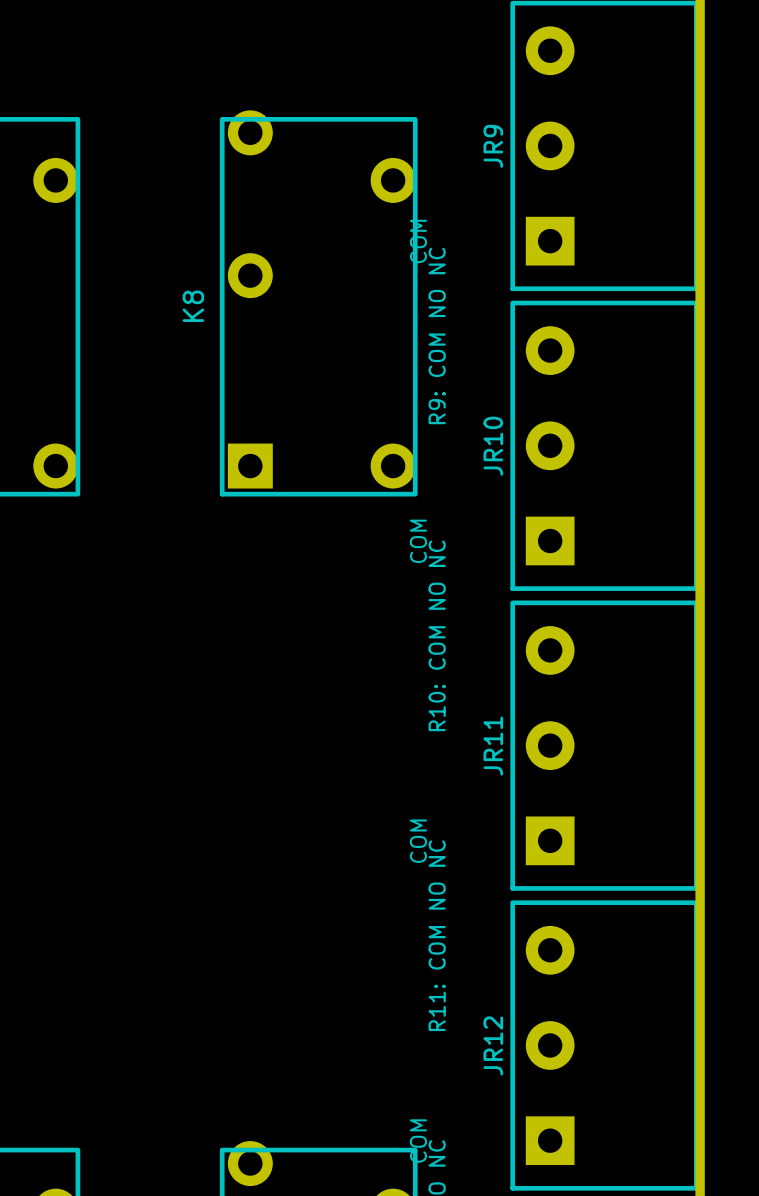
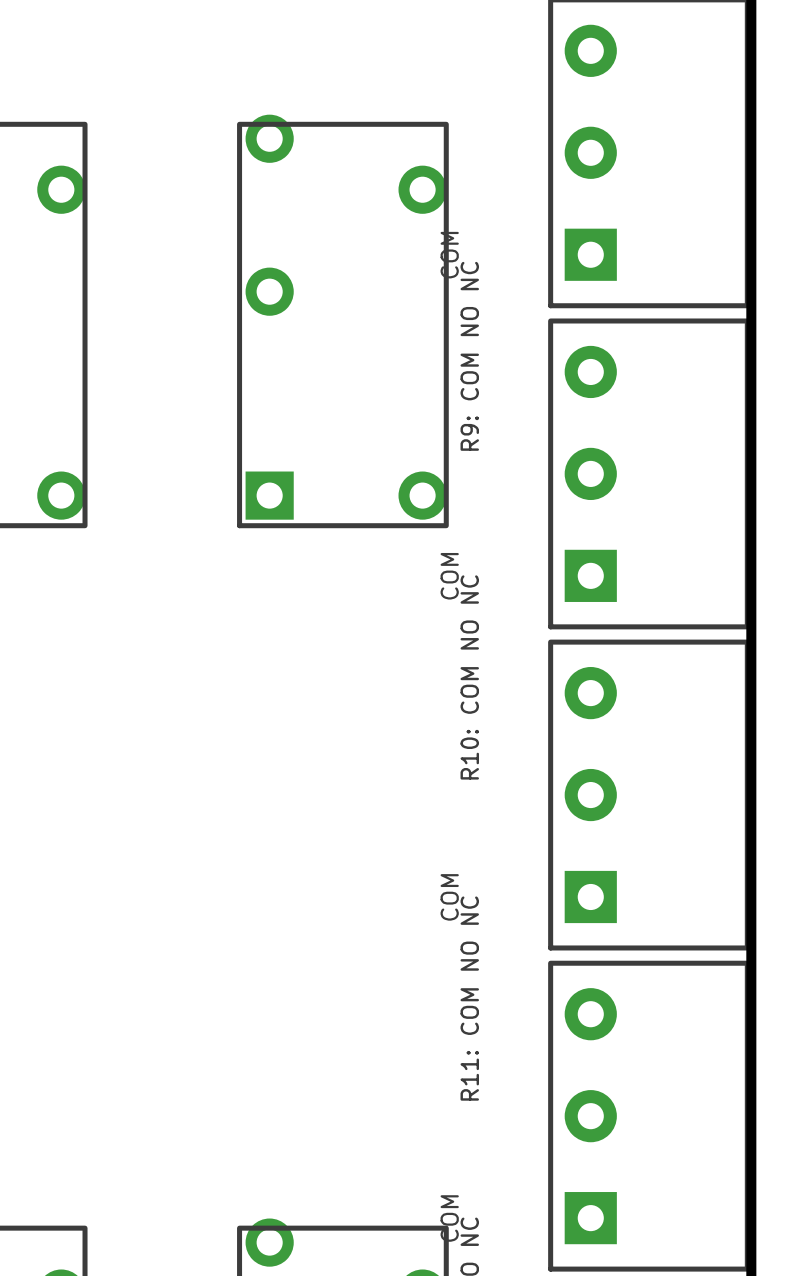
JR9 name: JR9 (493, 146) -> none
K8 name: K8 (193, 306) -> none
JR10 name: JR10 (493, 446) -> none
JR11 name: JR11 (493, 746) -> none
JR12 name: JR12 (493, 1045) -> none

